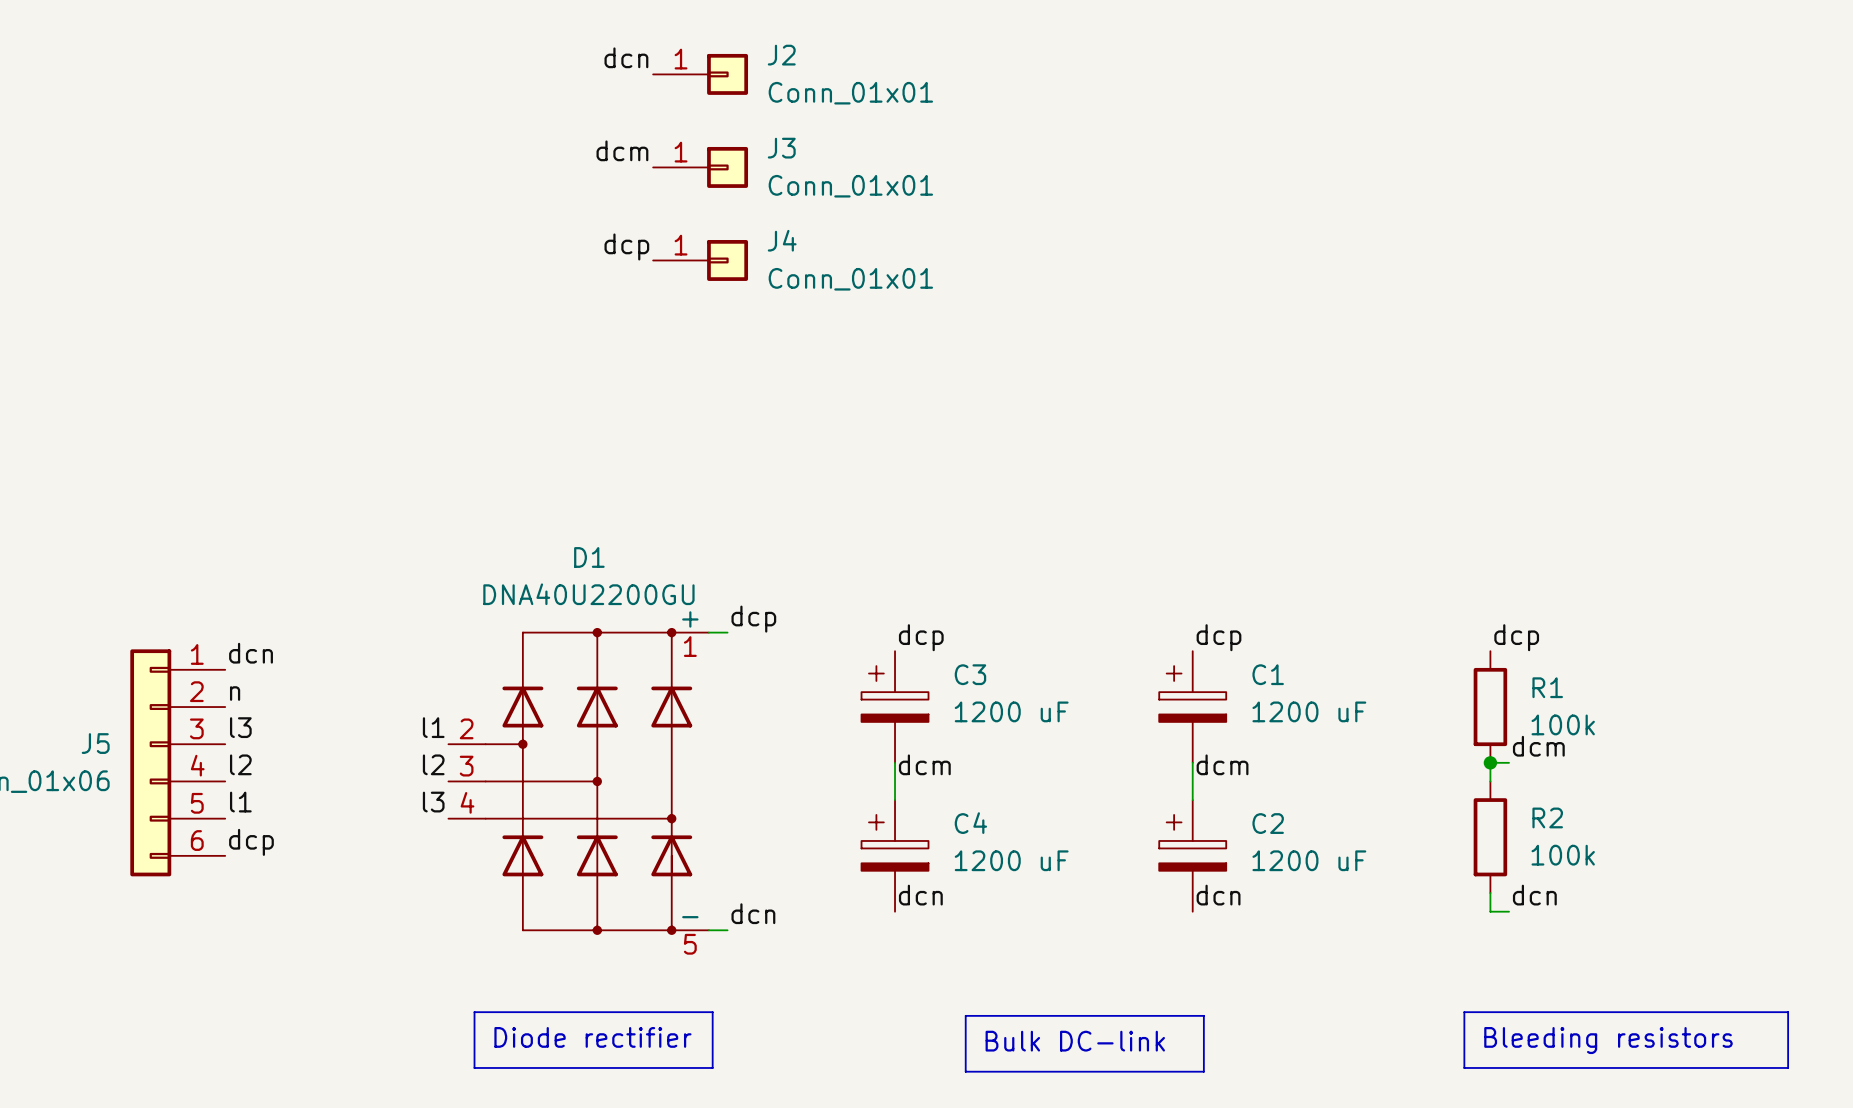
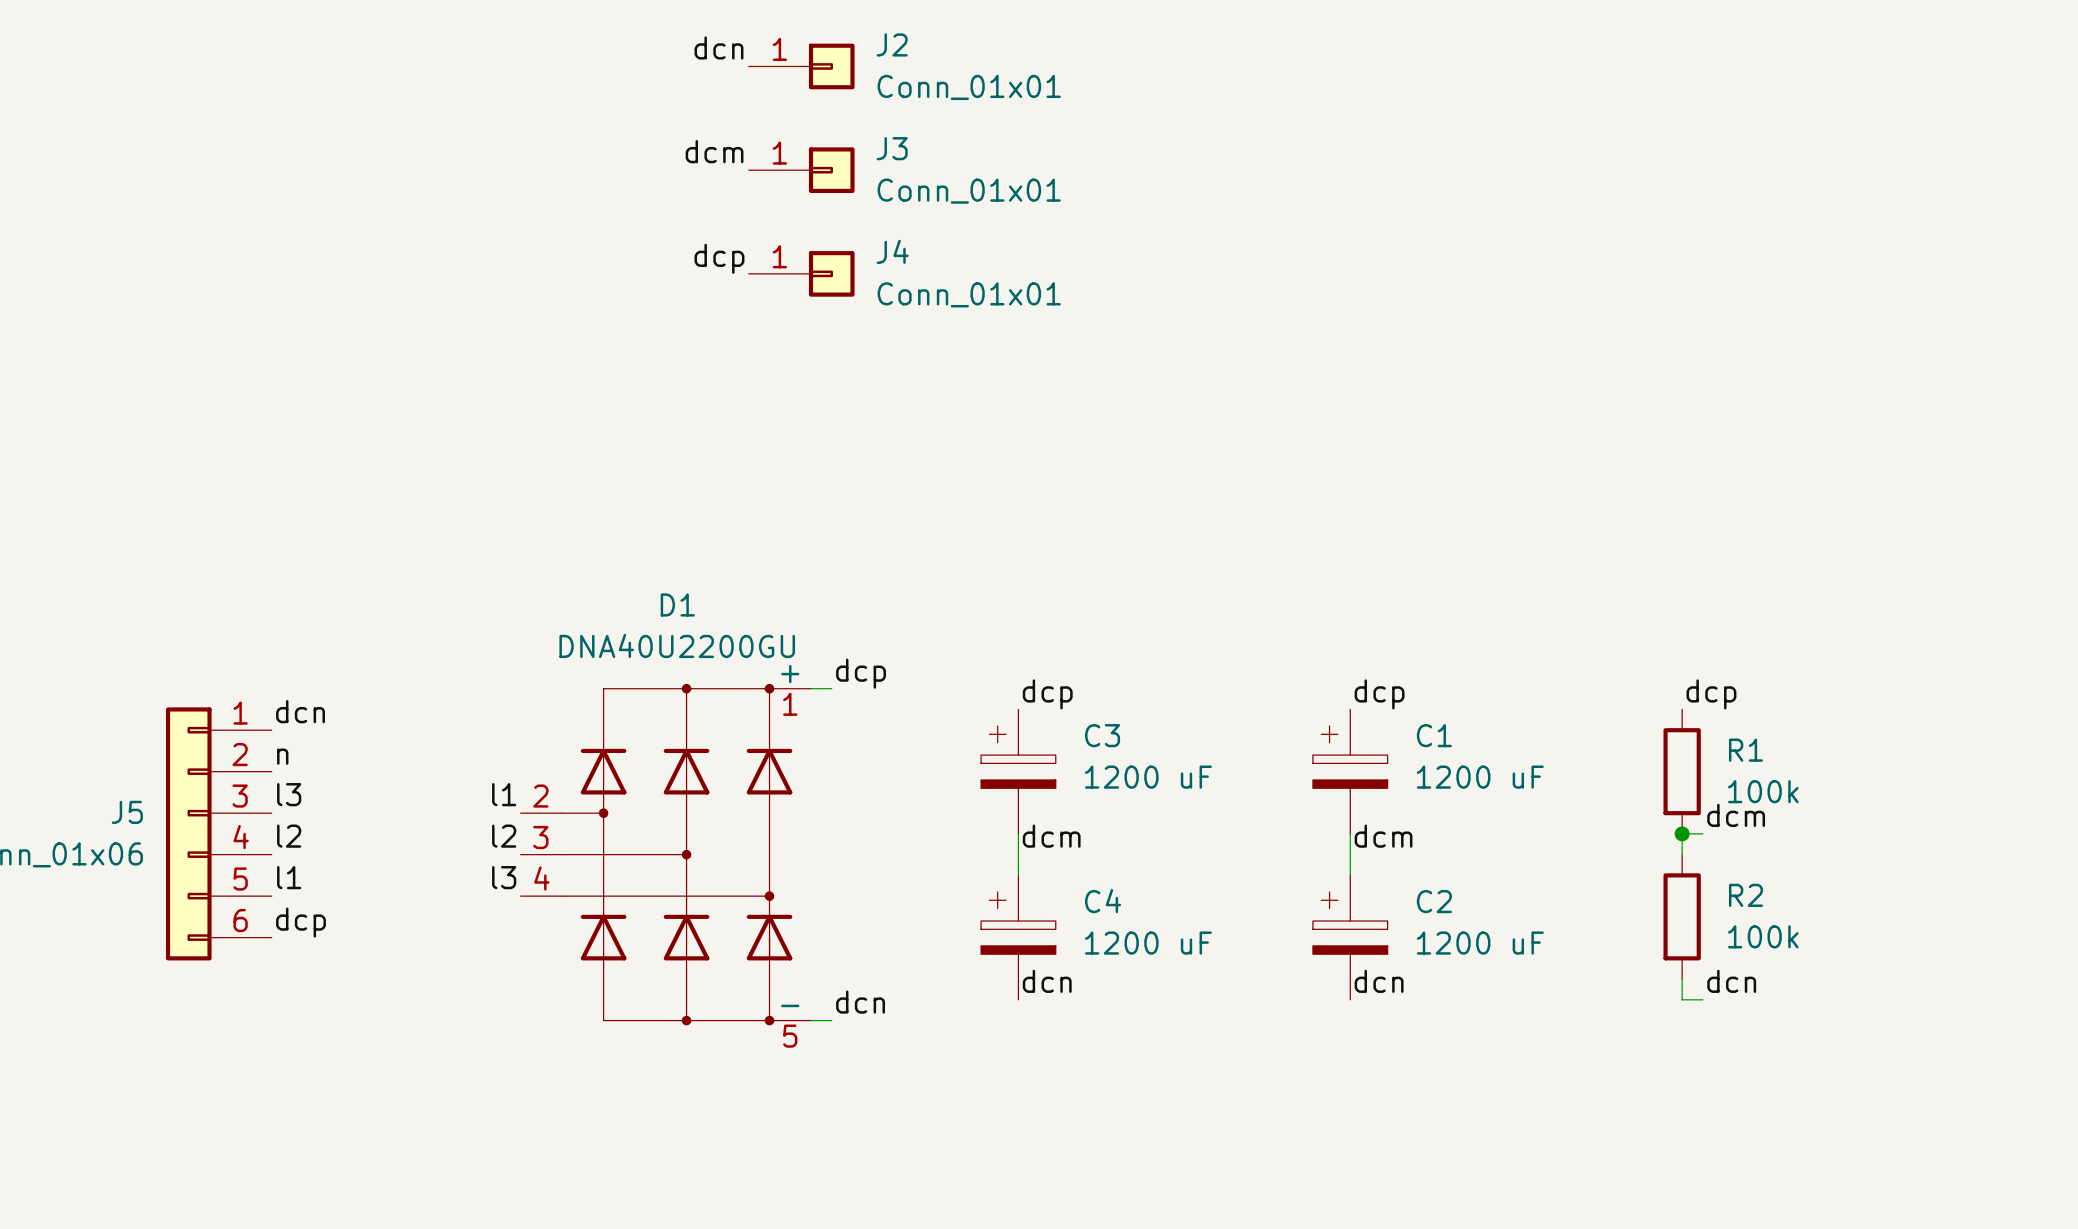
line: (474, 1012) (712, 1012) (712, 1067) (474, 1067) (474, 1012) -> none
line: (1464, 1012) (1788, 1012) (1788, 1067) (1464, 1067) (1464, 1012) -> none
line: (965, 1015) (1203, 1015) (1203, 1071) (965, 1071) (965, 1015) -> none
text: Diode rectifier (592, 1037) -> none
text: Bleeding resistors (1608, 1040) -> none
text: Bulk DC-link (1075, 1041) -> none

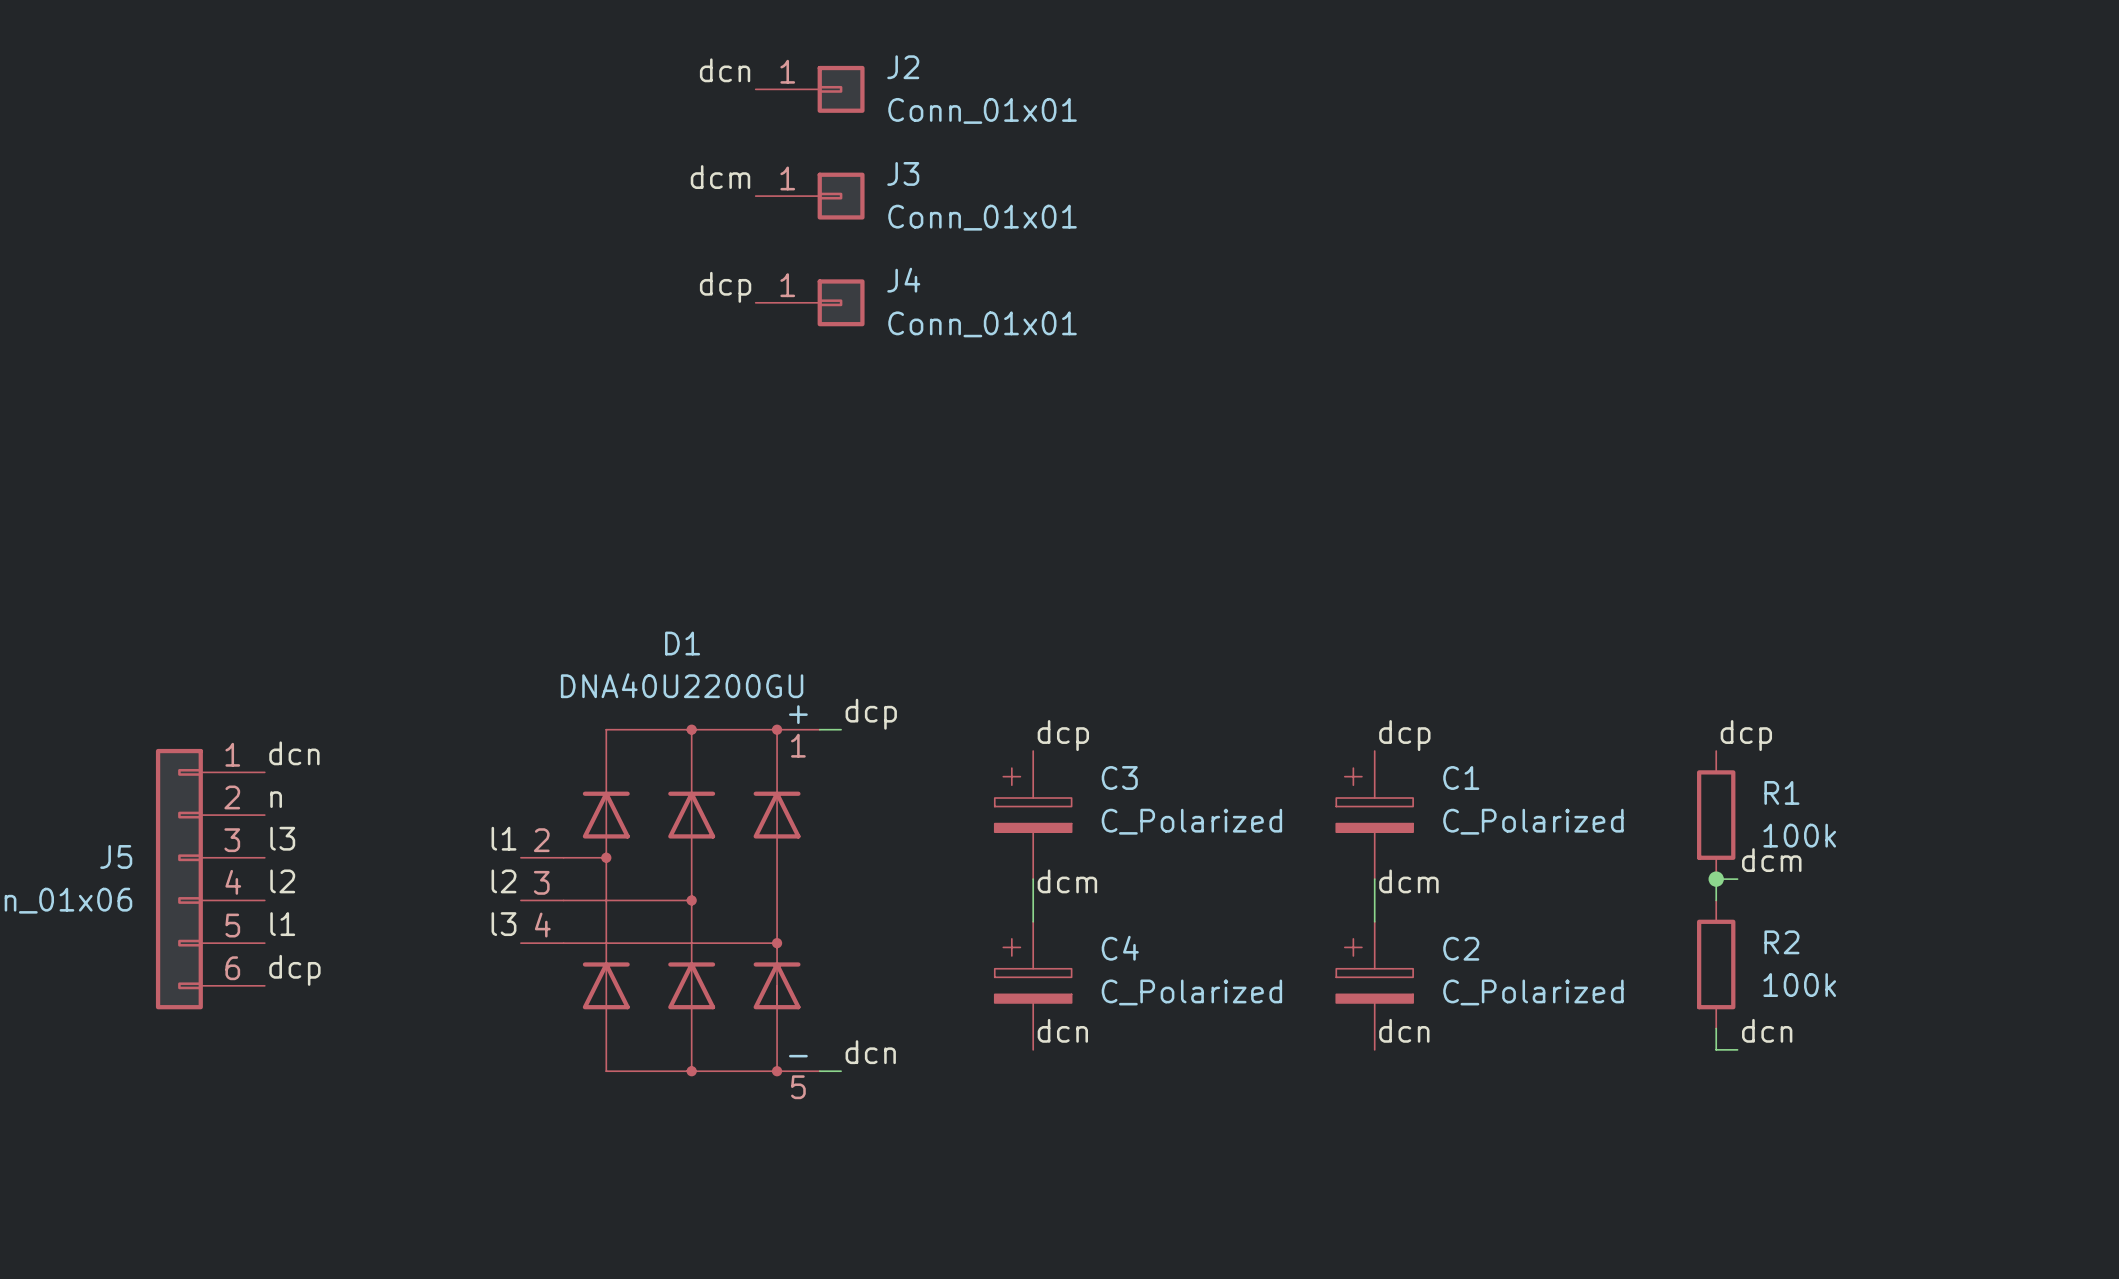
C3 value: 1200 uF (1148, 777) -> C_Polarized (1191, 821)
C1 value: 1200 uF (1480, 777) -> C_Polarized (1533, 821)
C4 value: 1200 uF (1148, 943) -> C_Polarized (1191, 992)
C2 value: 1200 uF (1480, 943) -> C_Polarized (1533, 992)

